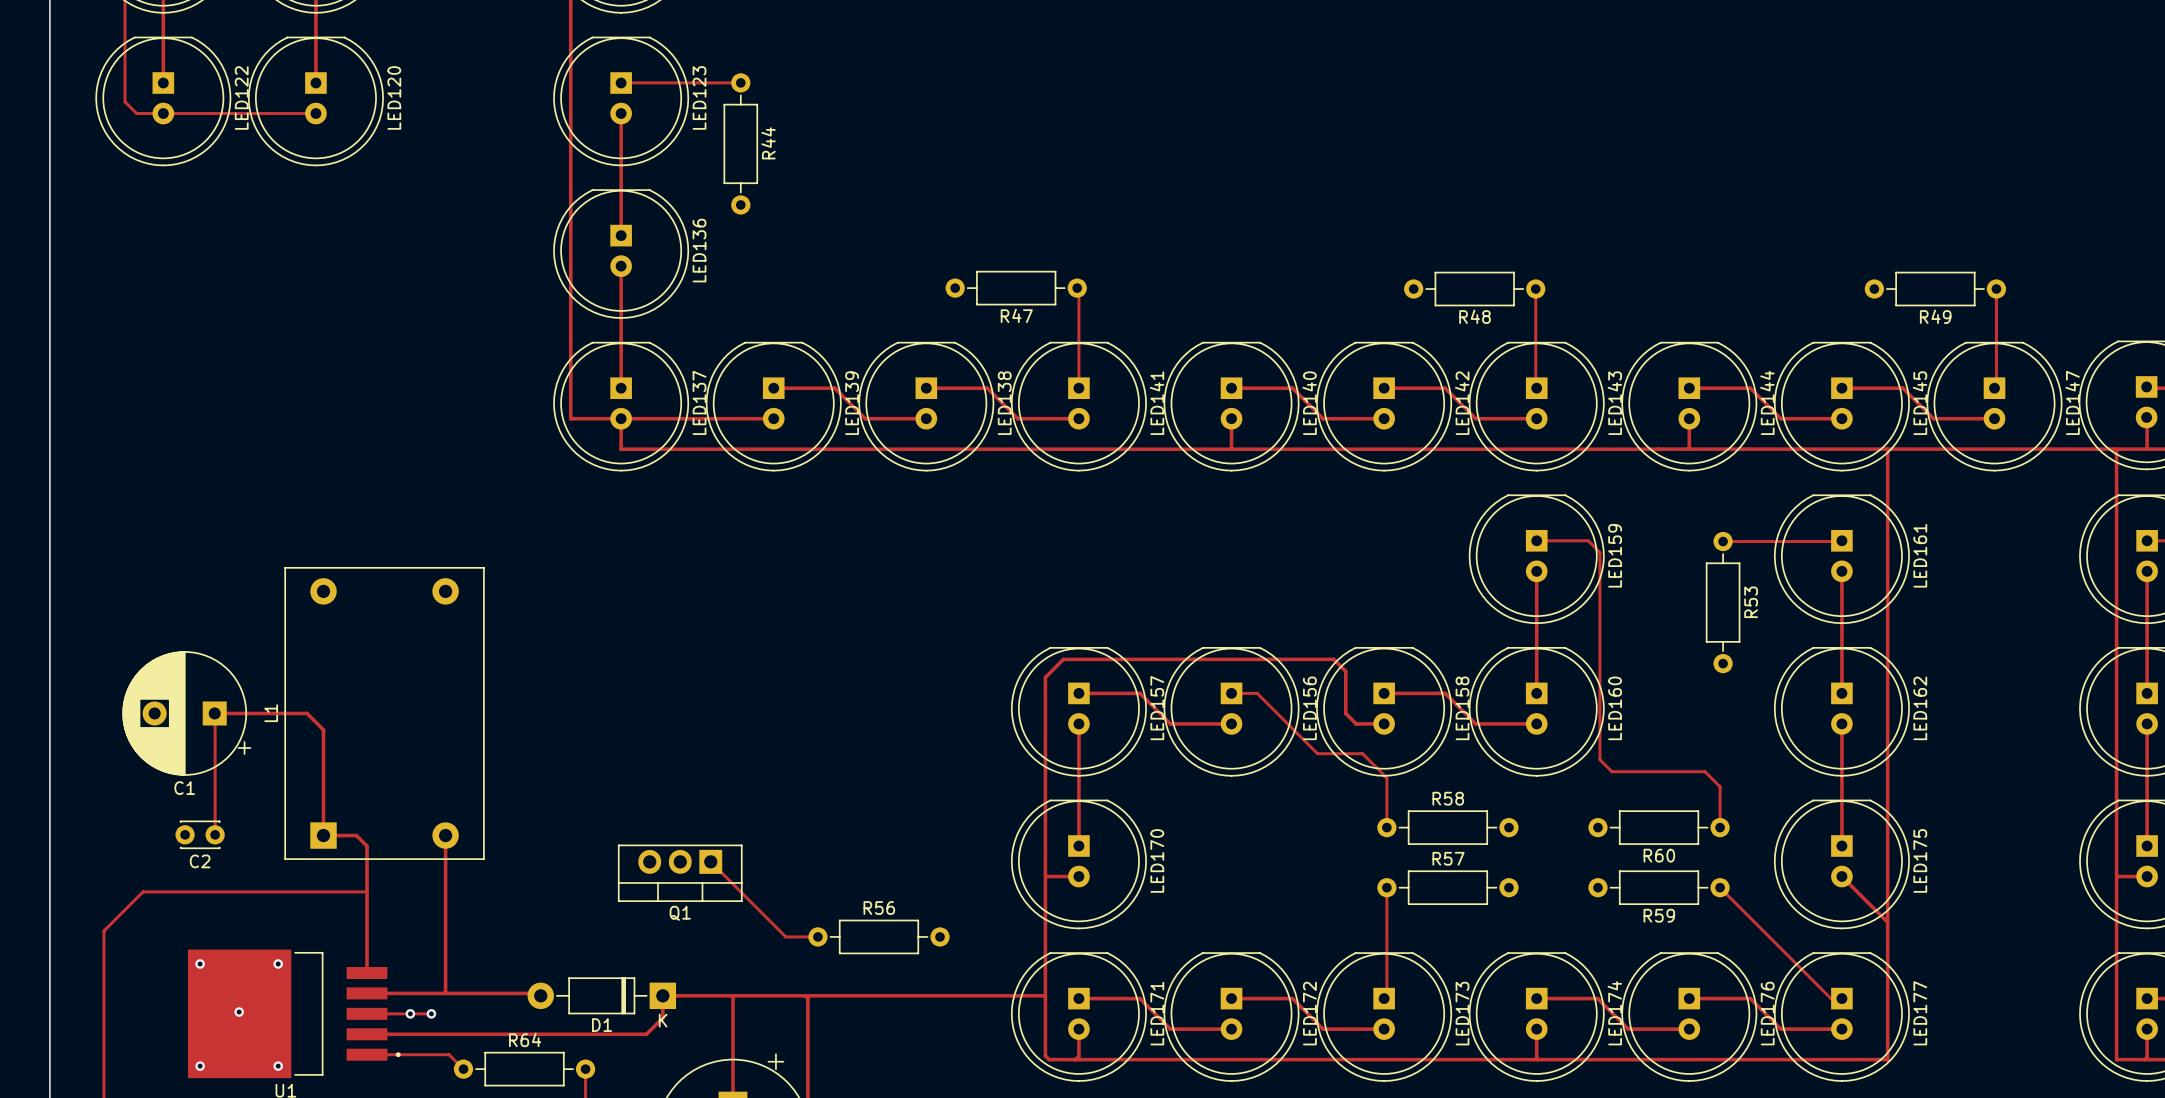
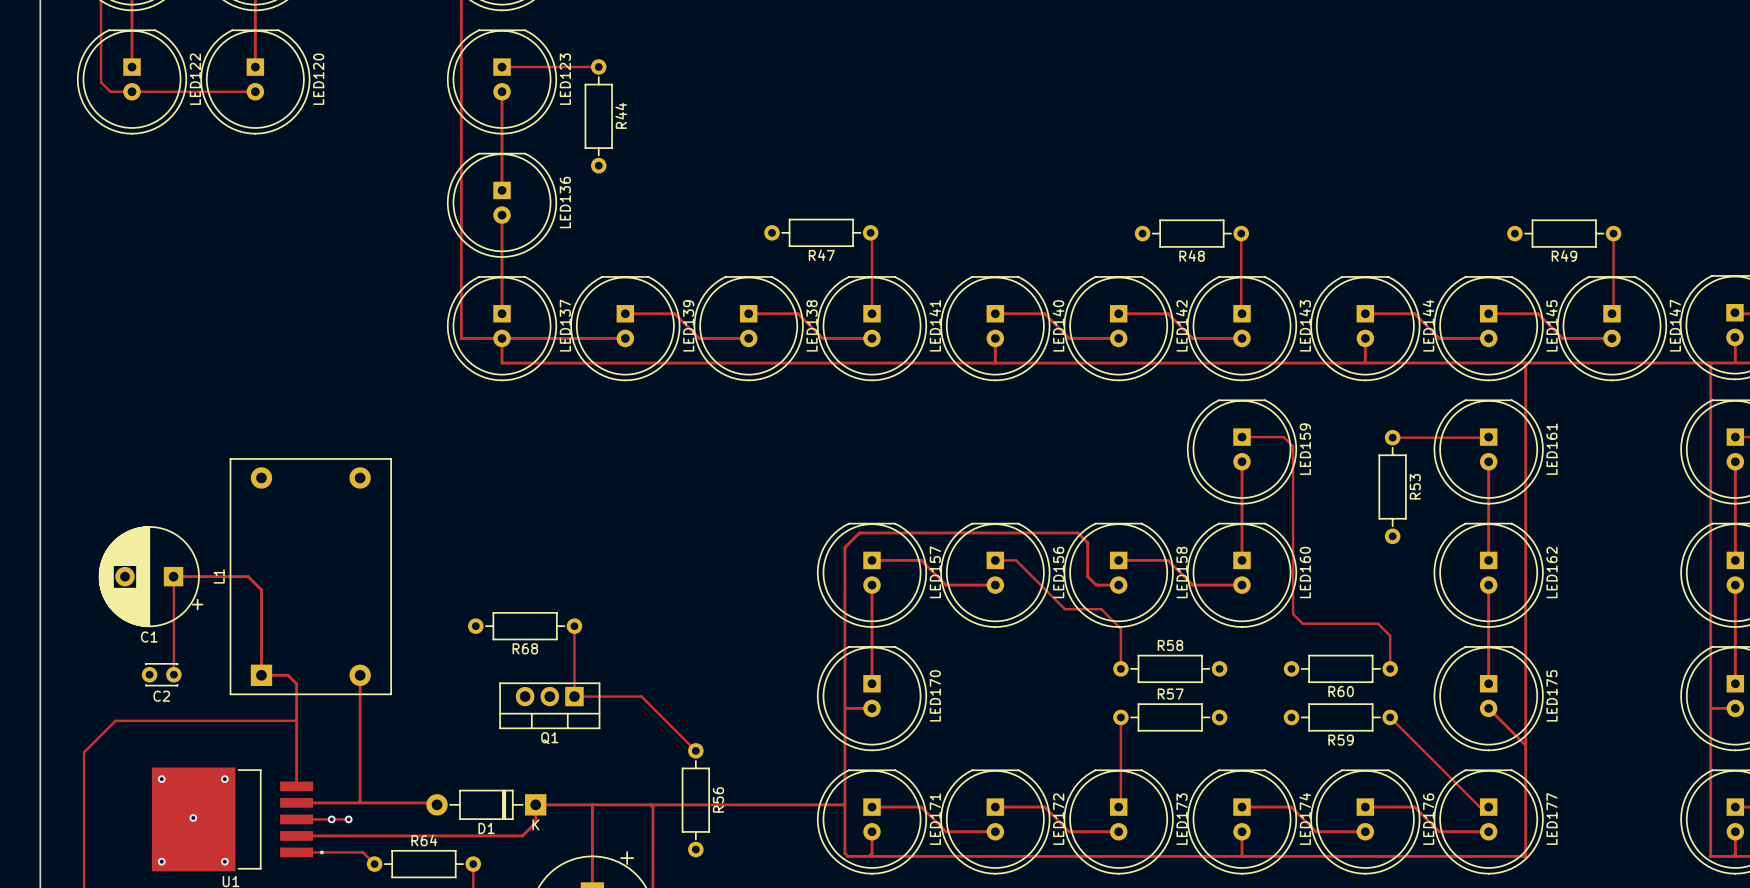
R68: none -> (525, 626)
track: none -> (574, 626) (574, 696) (641, 696) (695, 750)
track: (710, 861) (785, 936) (817, 936) -> none
R56 rotation: 0° (878, 936) -> 90° clockwise (695, 800)

